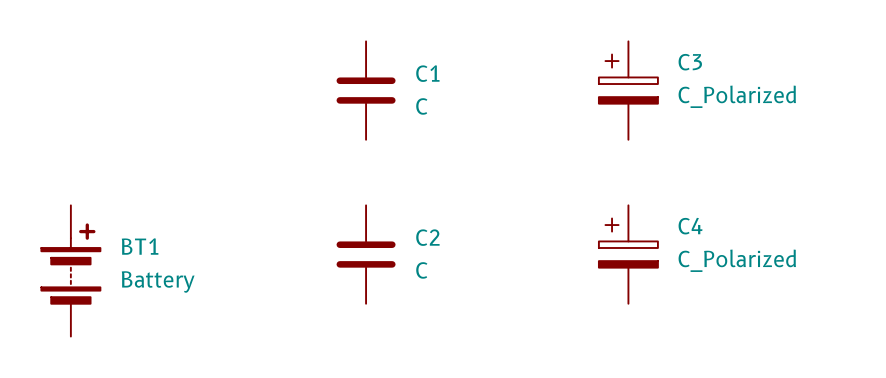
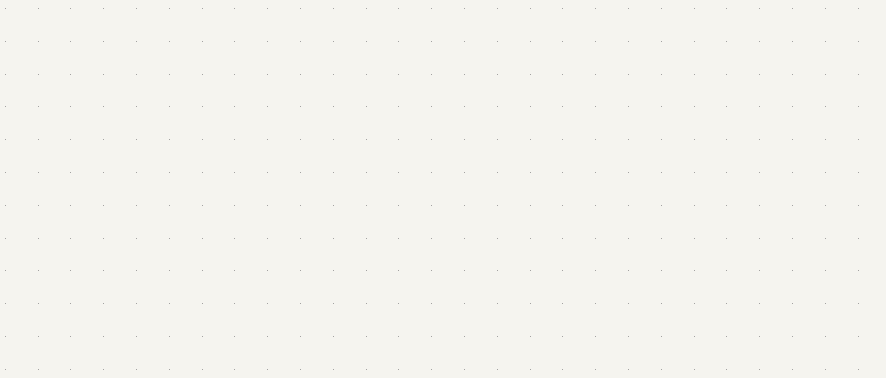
C1: C (366, 90) -> none
C3: C_Polarized (628, 90) -> none
C2: C (366, 254) -> none
C4: C_Polarized (628, 254) -> none
BT1: Battery (70, 270) -> none

